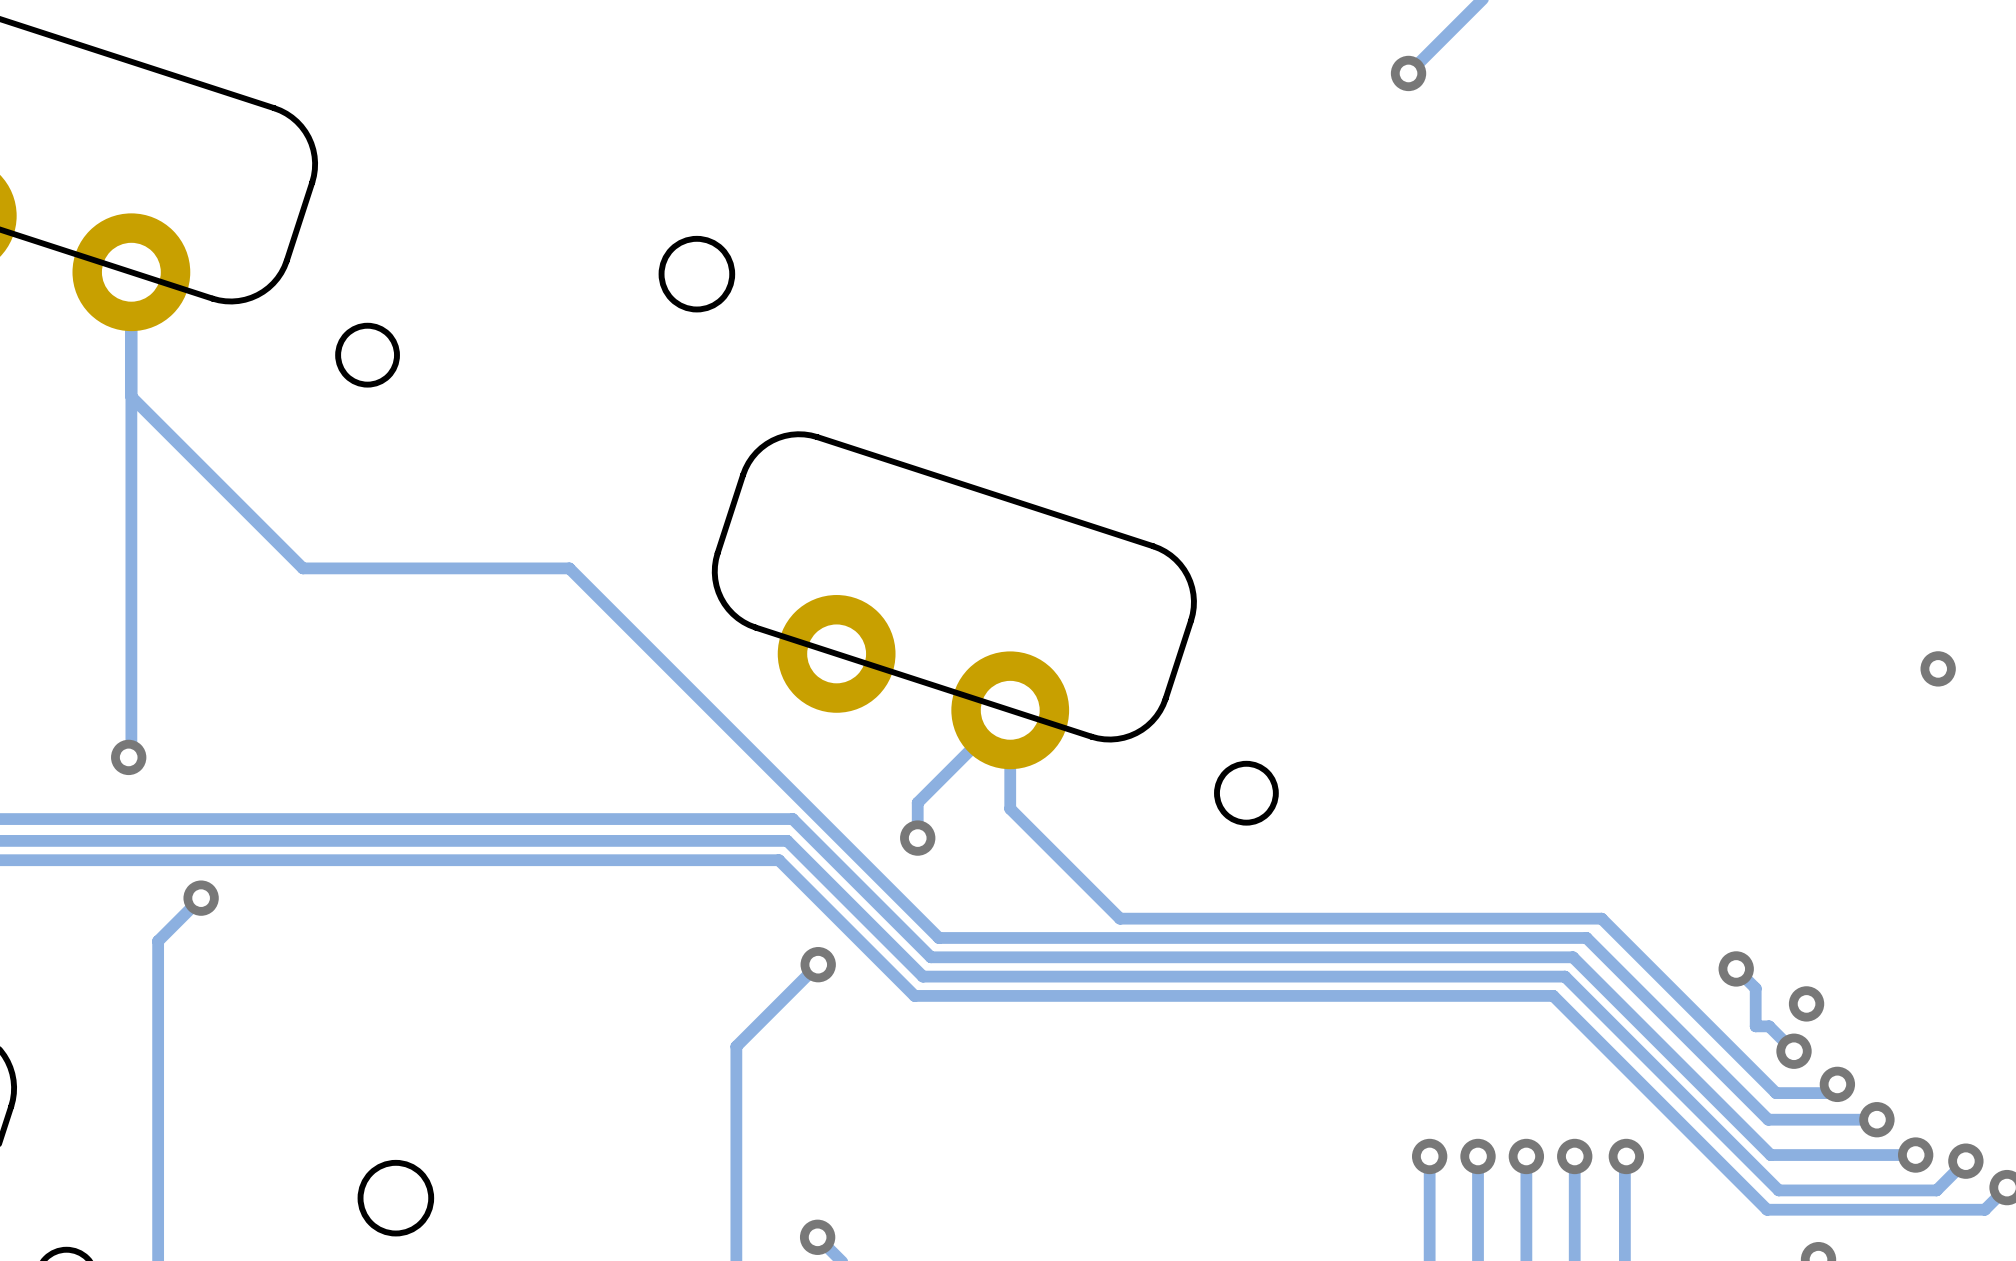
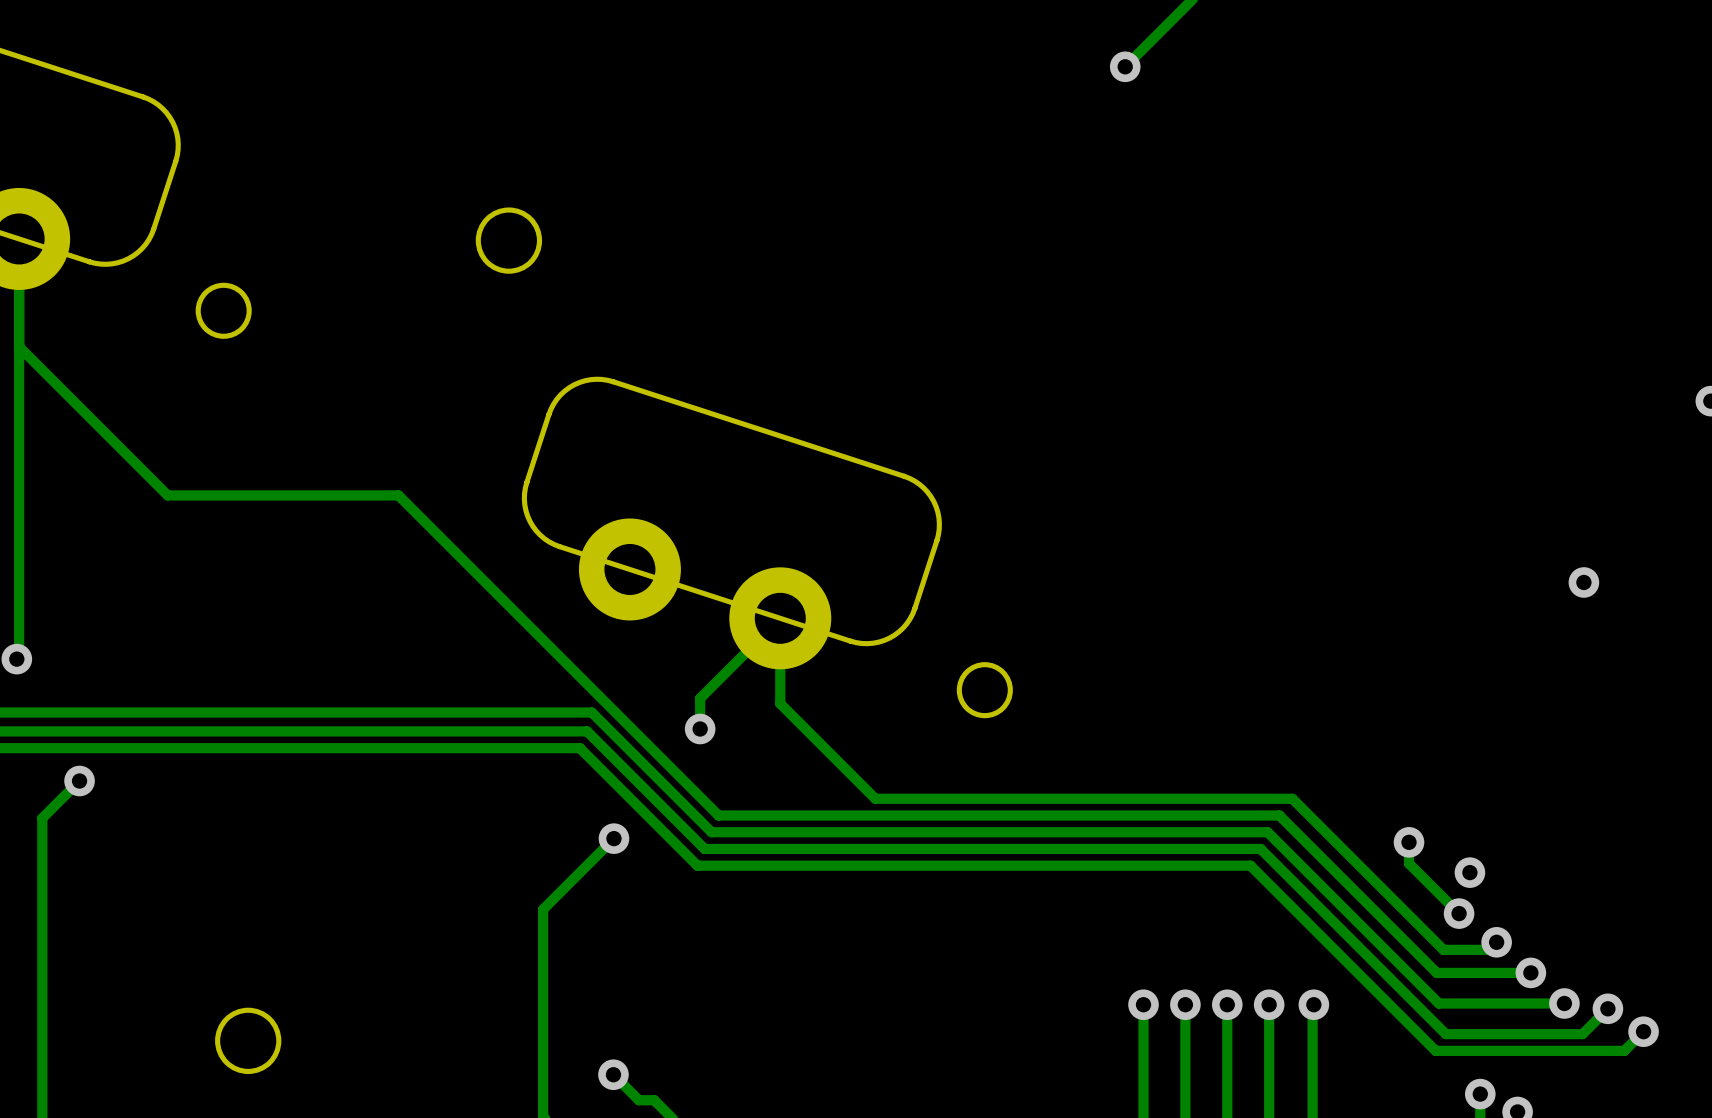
track: (1736, 968) (1755, 988) (1755, 1026) (1769, 1026) -> (1409, 842) (1409, 863) (1437, 892)

